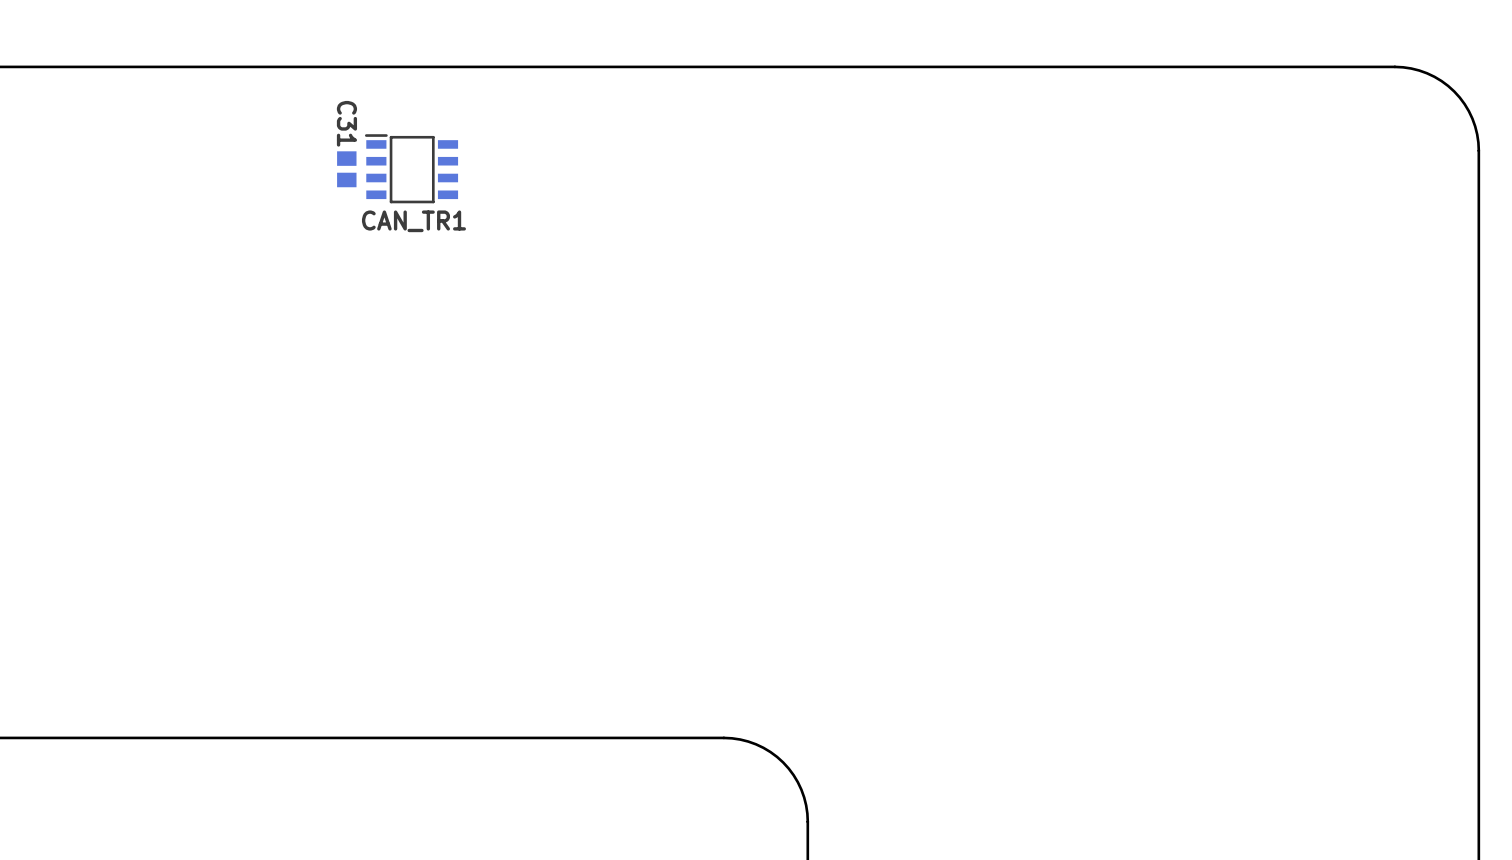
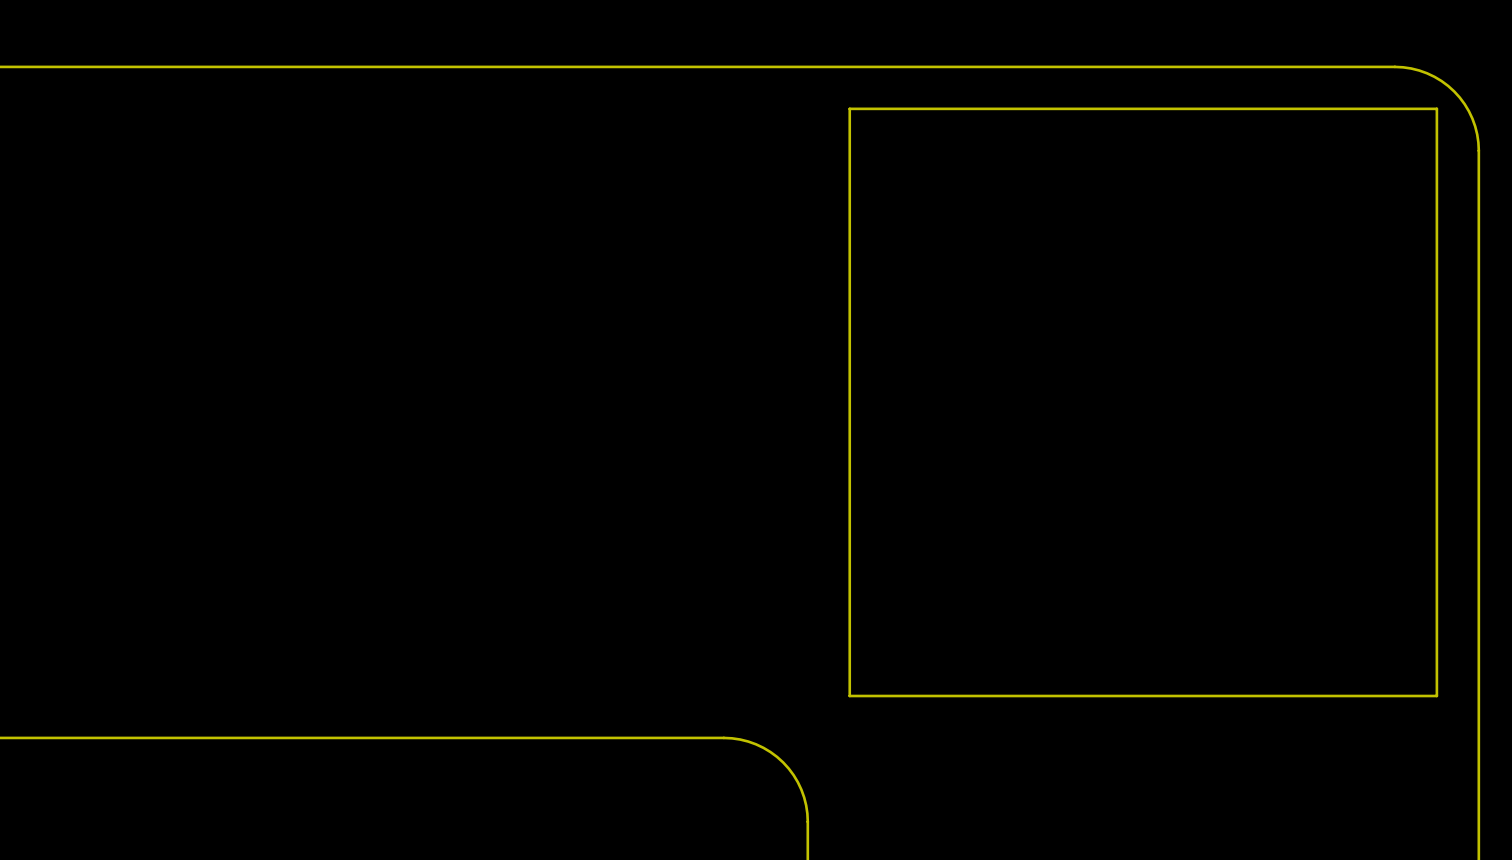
board edge: none -> (1436, 108) (849, 108) (849, 696) (1436, 696) (1436, 108)
CAN_TR1: (411, 168) -> none
C31: (346, 169) -> none

